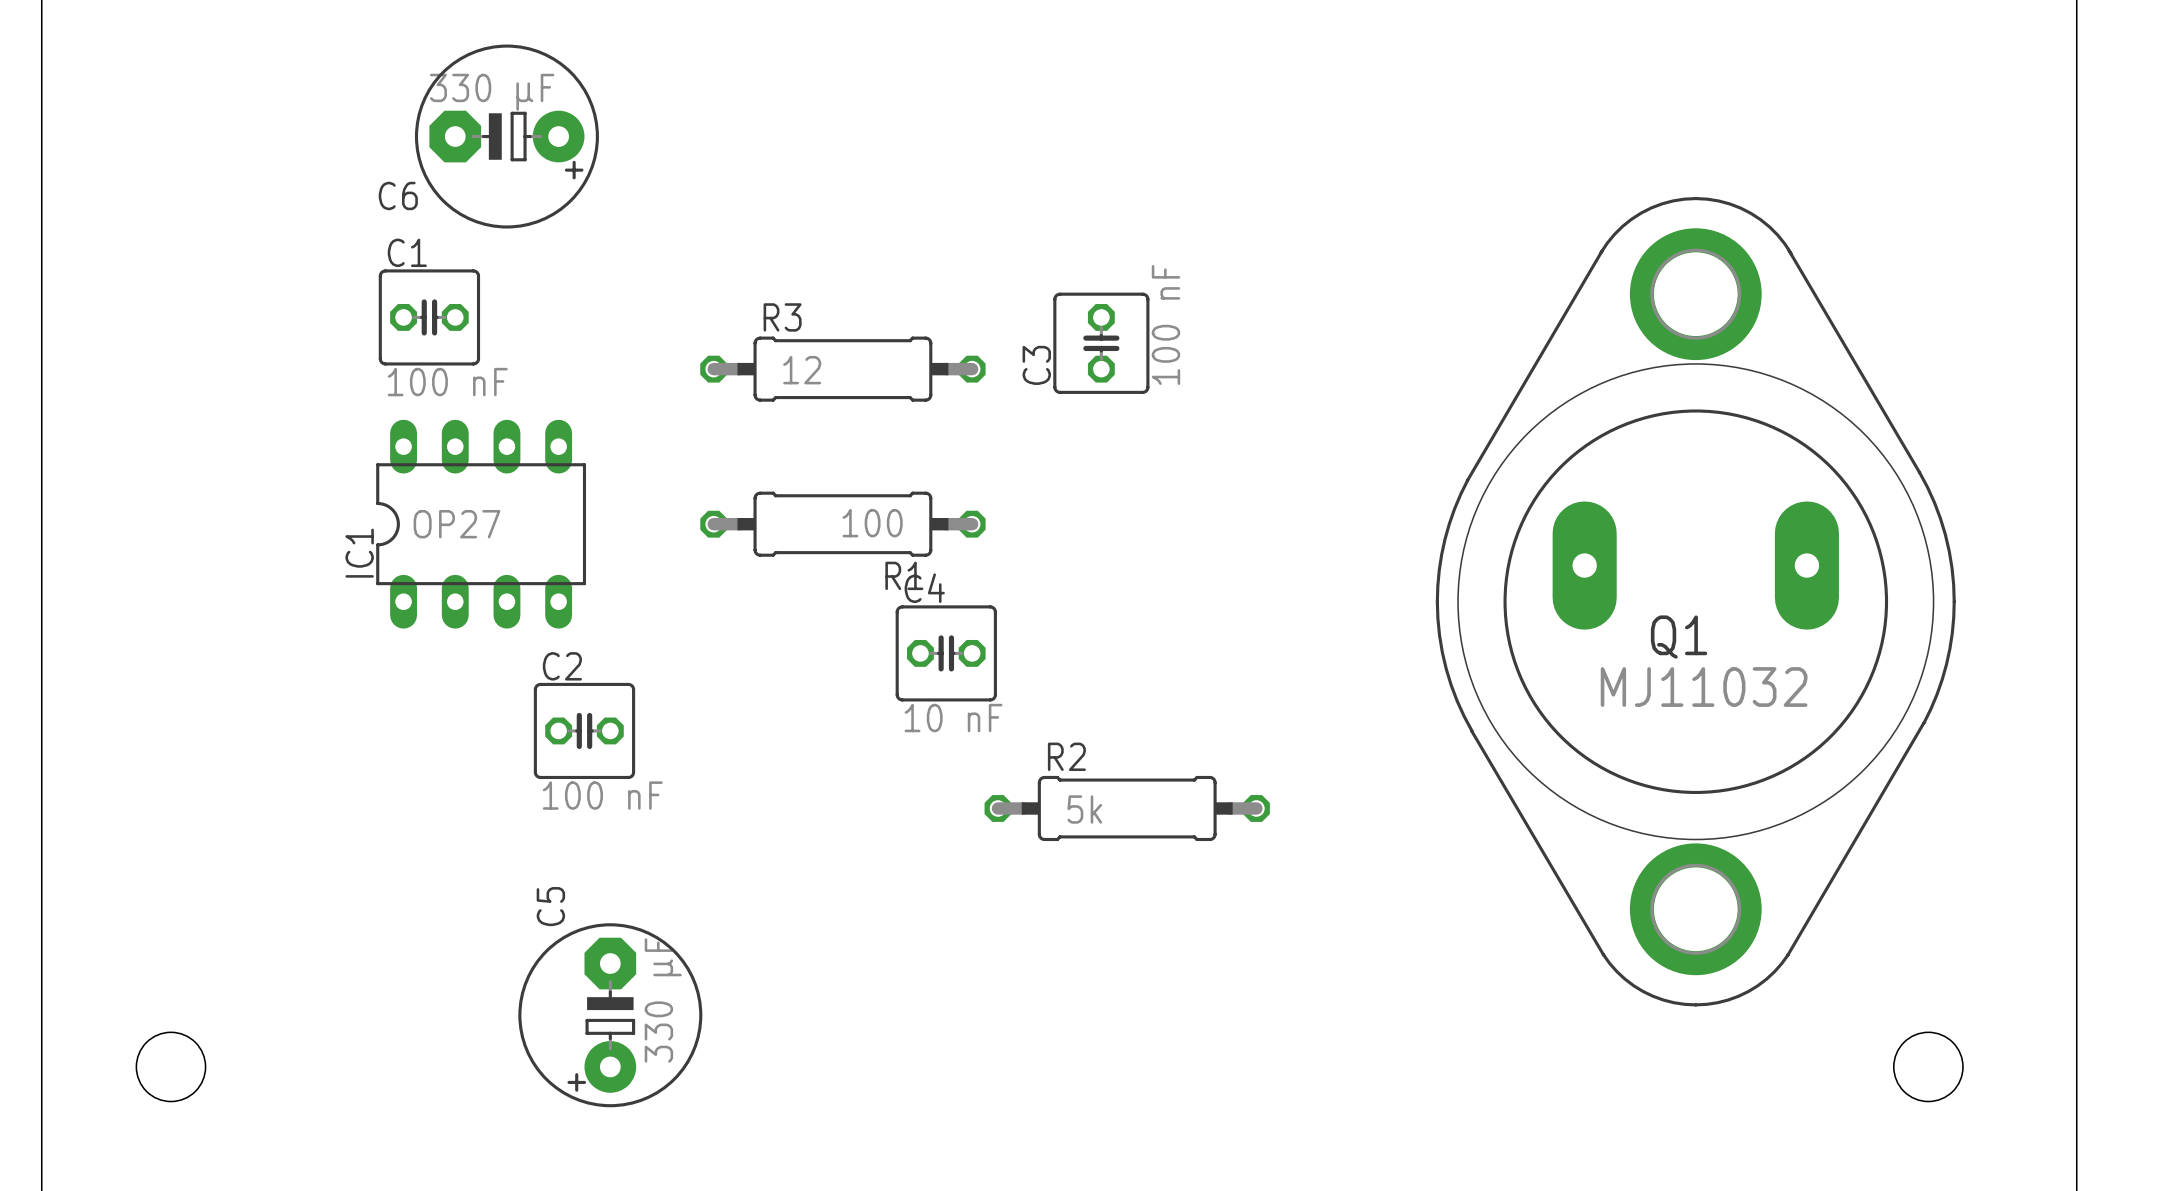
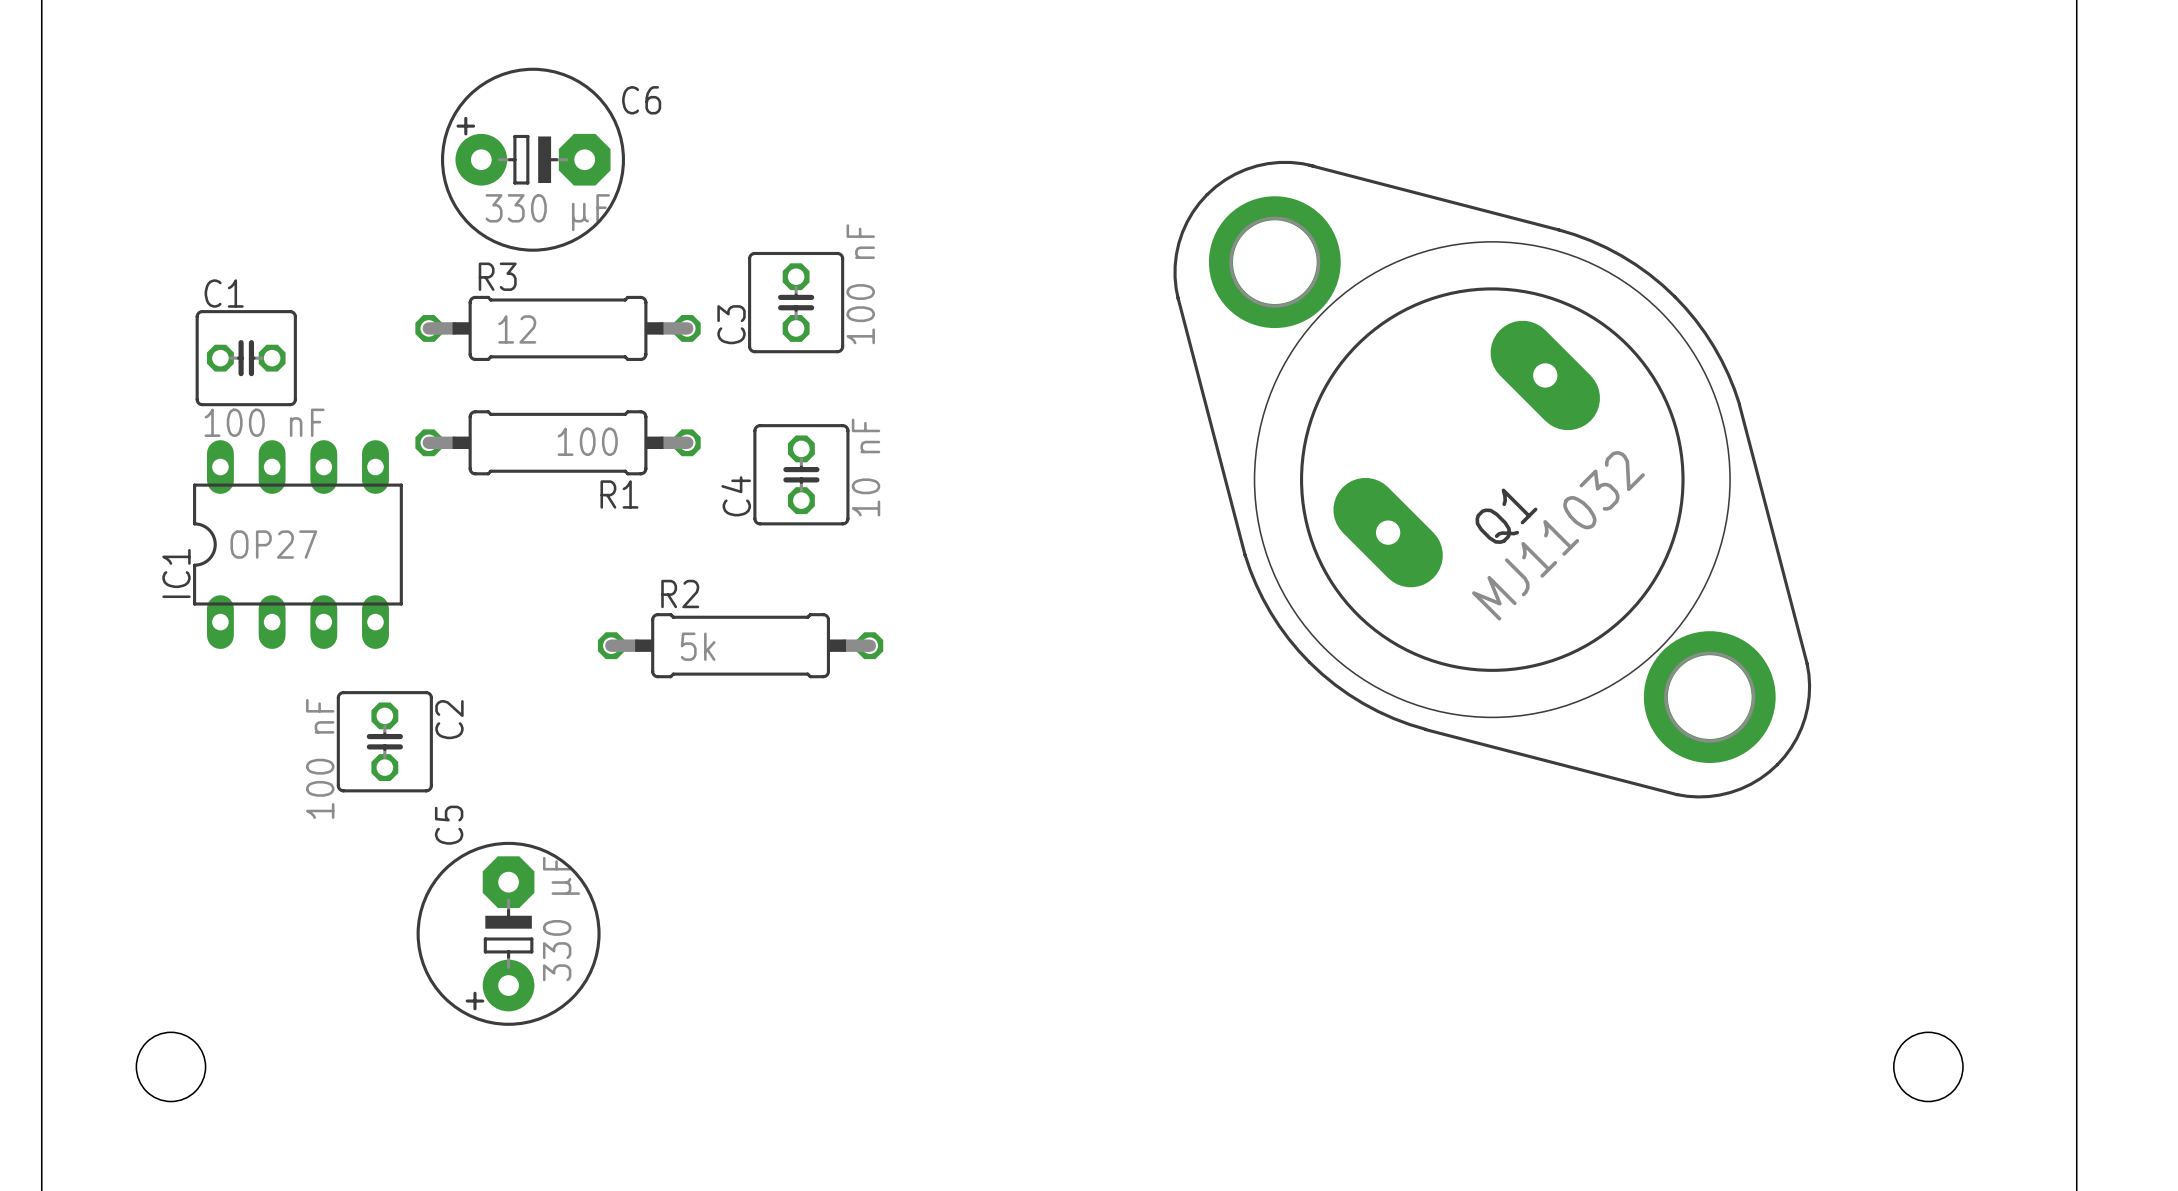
C6 rotation: 0° (506, 136) -> 180° (532, 159)
C1 position: (429, 317) -> (246, 358)
C3 position: (1101, 343) -> (796, 302)
R3 position: (842, 369) -> (558, 328)
IC1 position: (481, 524) -> (297, 544)
R1 position: (842, 524) -> (558, 442)
C4 name position: C4 (924, 588) -> C4 (736, 496)
Q1 rotation: 0° (1695, 601) -> 45° counterclockwise (1492, 479)
C4 rotation: 0° (946, 653) -> 90° clockwise (801, 474)
C4 position: (946, 653) -> (801, 474)
C4 value position: 10 nF (953, 718) -> 10 nF (866, 467)
C2 rotation: 0° (584, 730) -> 90° clockwise (384, 741)
C2 position: (584, 730) -> (384, 741)
R2 position: (1127, 808) -> (740, 645)
C5 position: (610, 1015) -> (508, 933)

